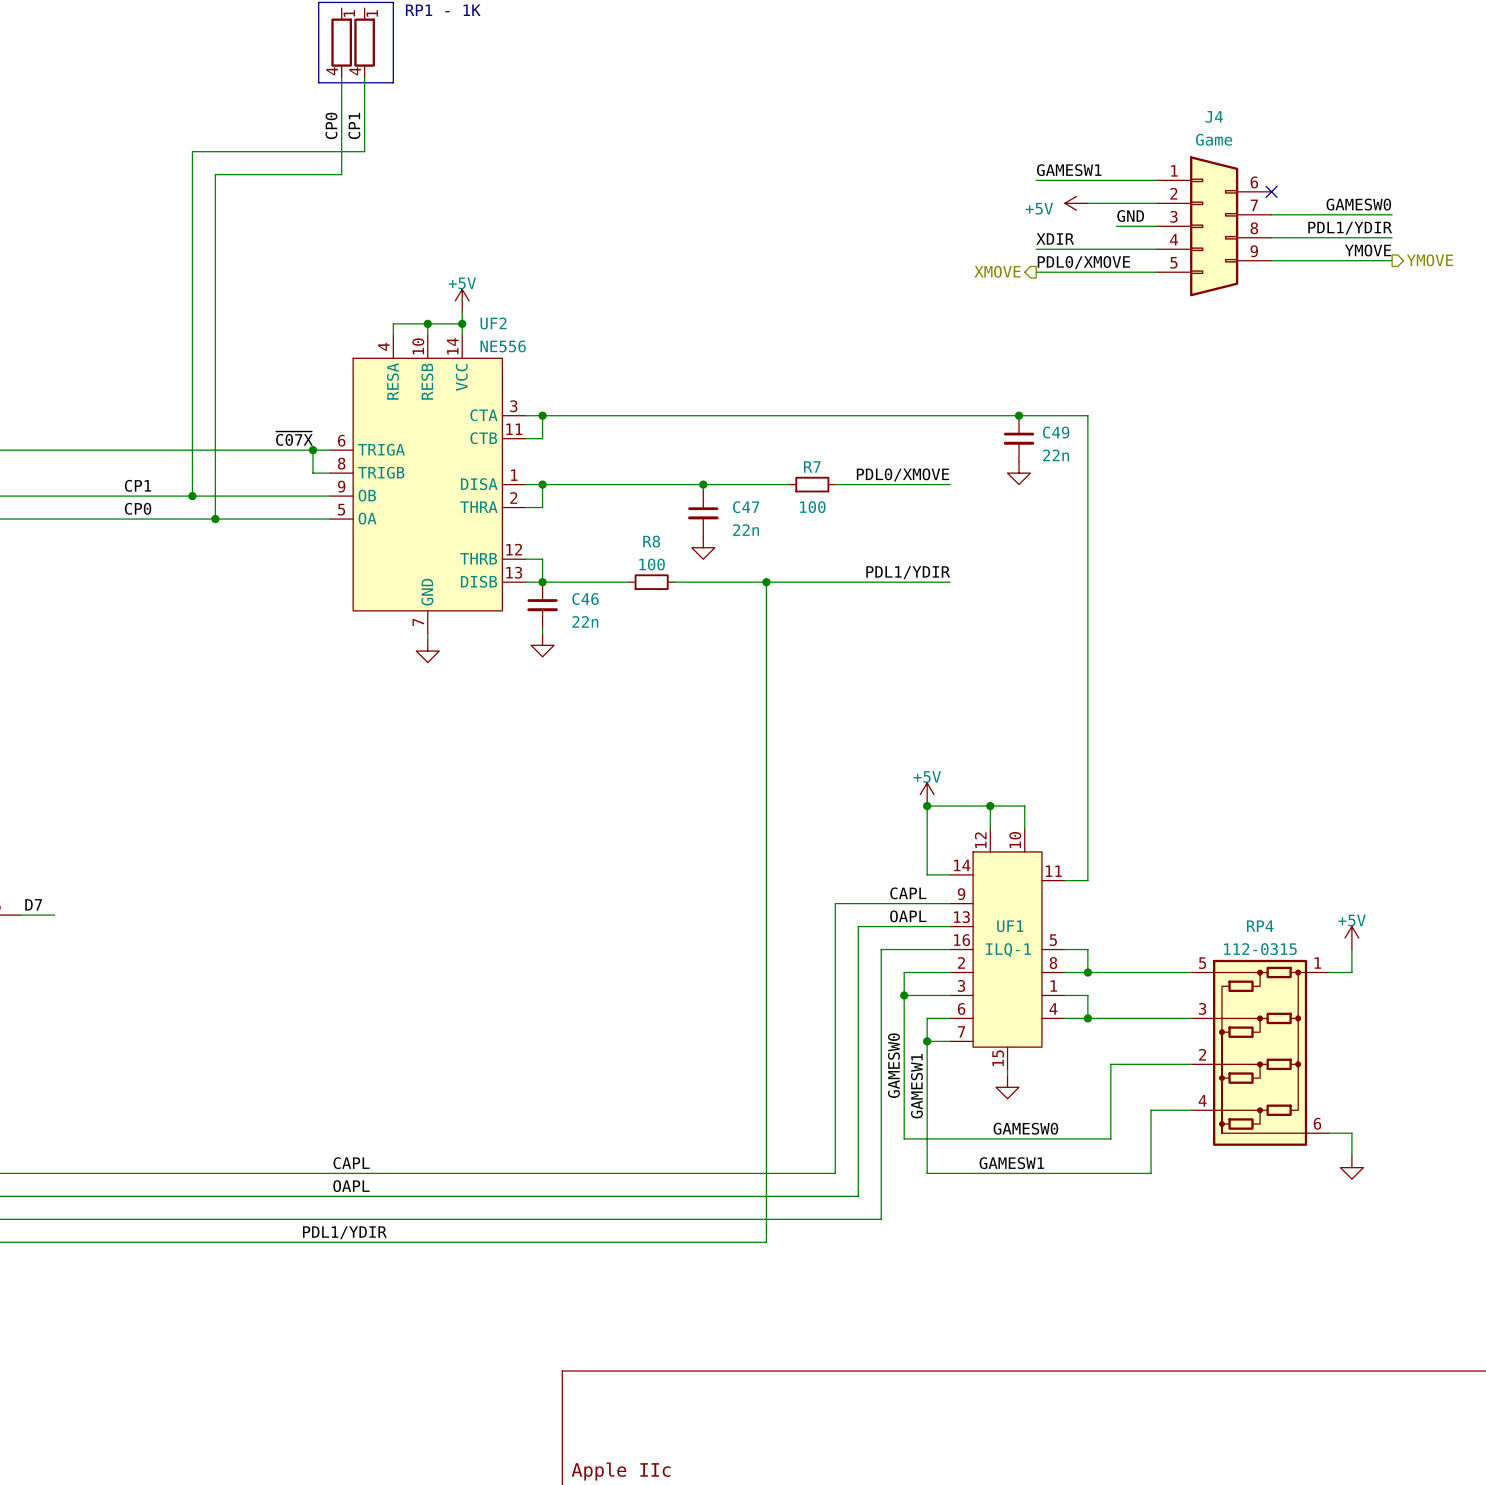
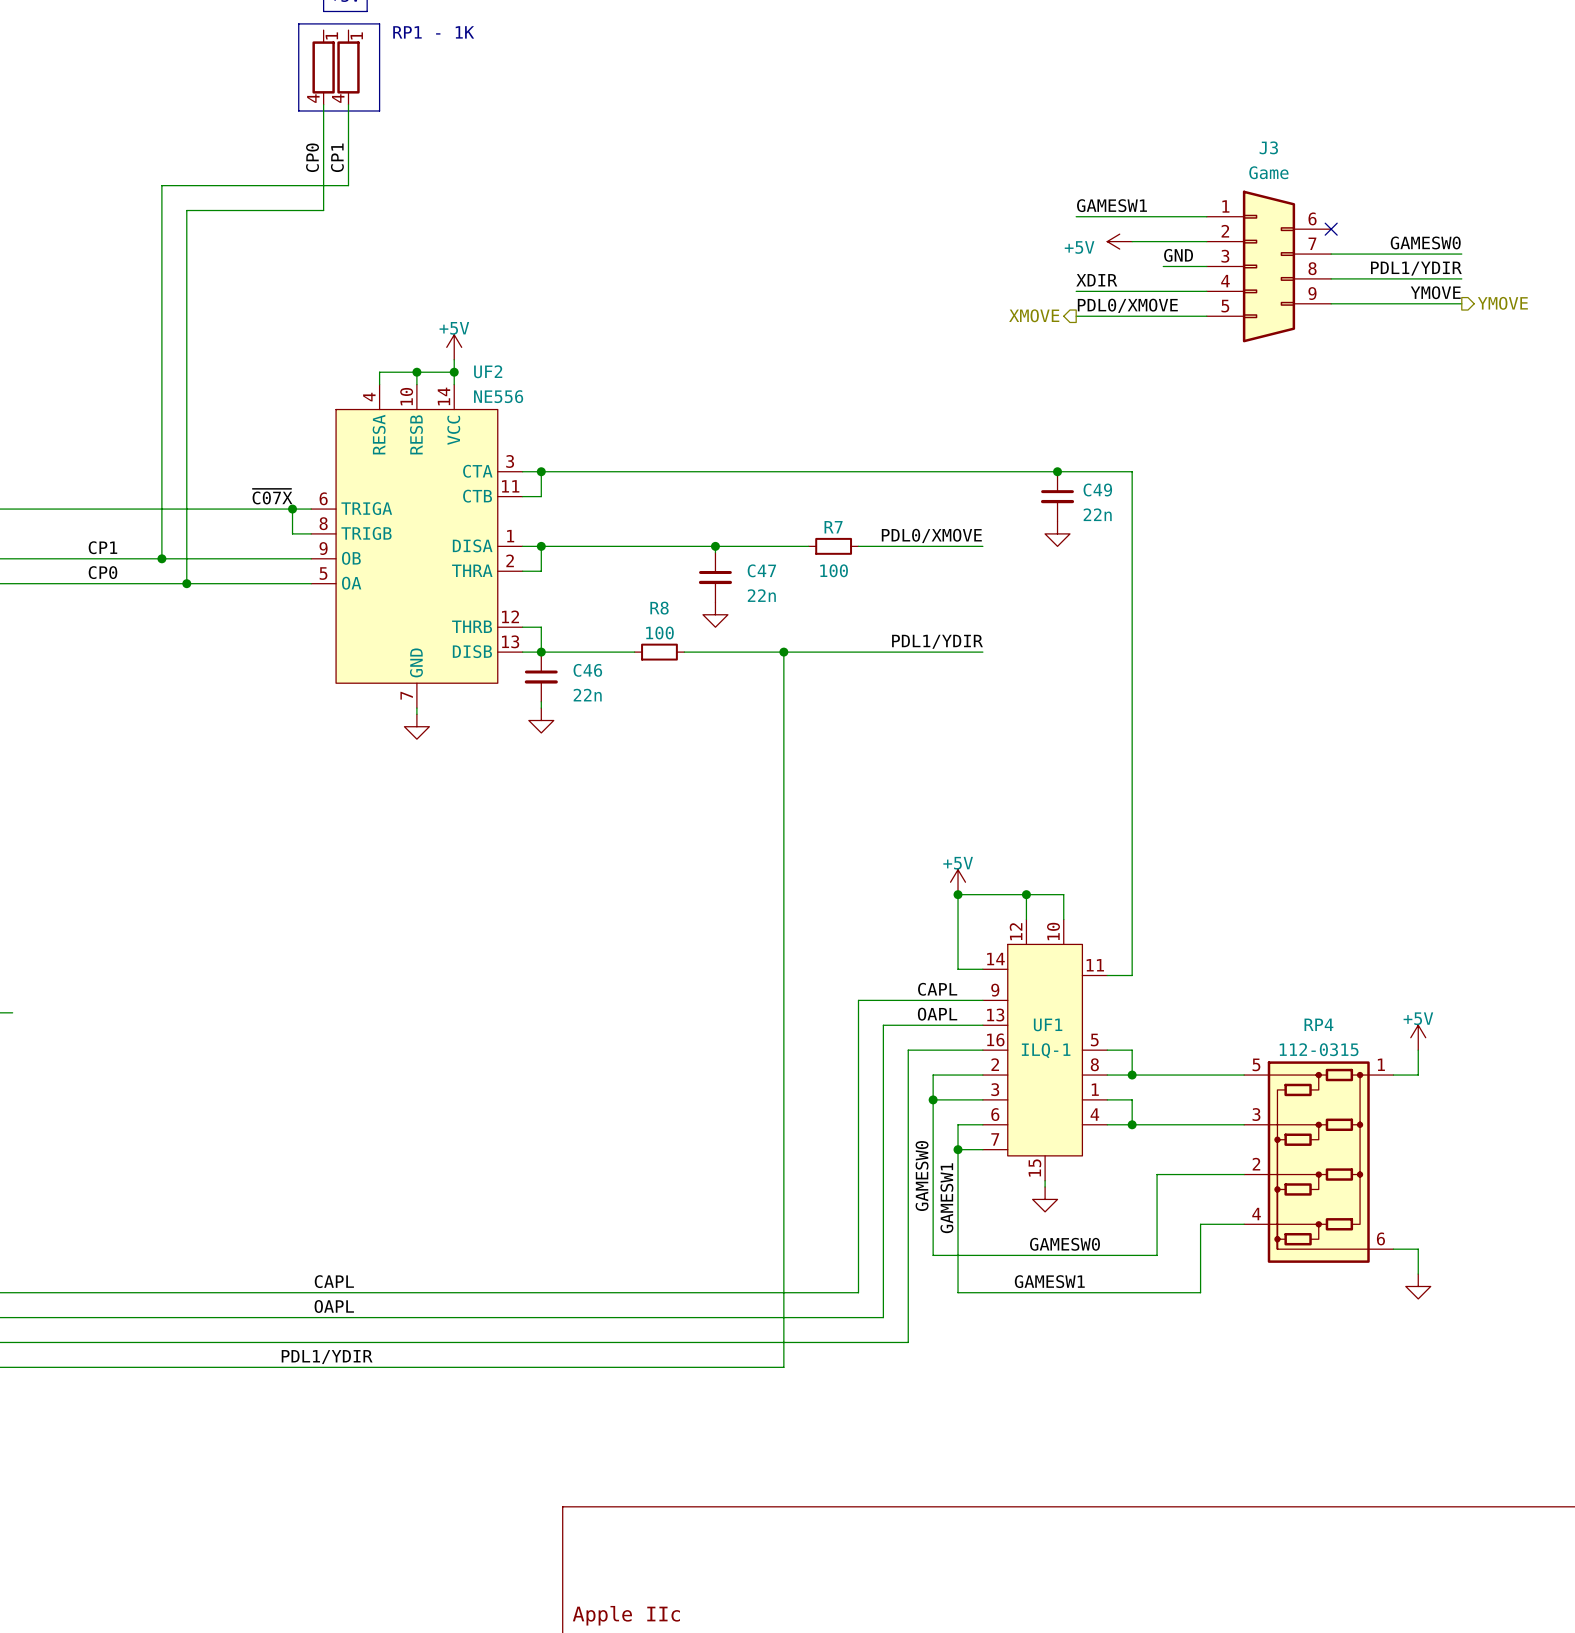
J4 name: J4 (1214, 116) -> J3 (1268, 147)

